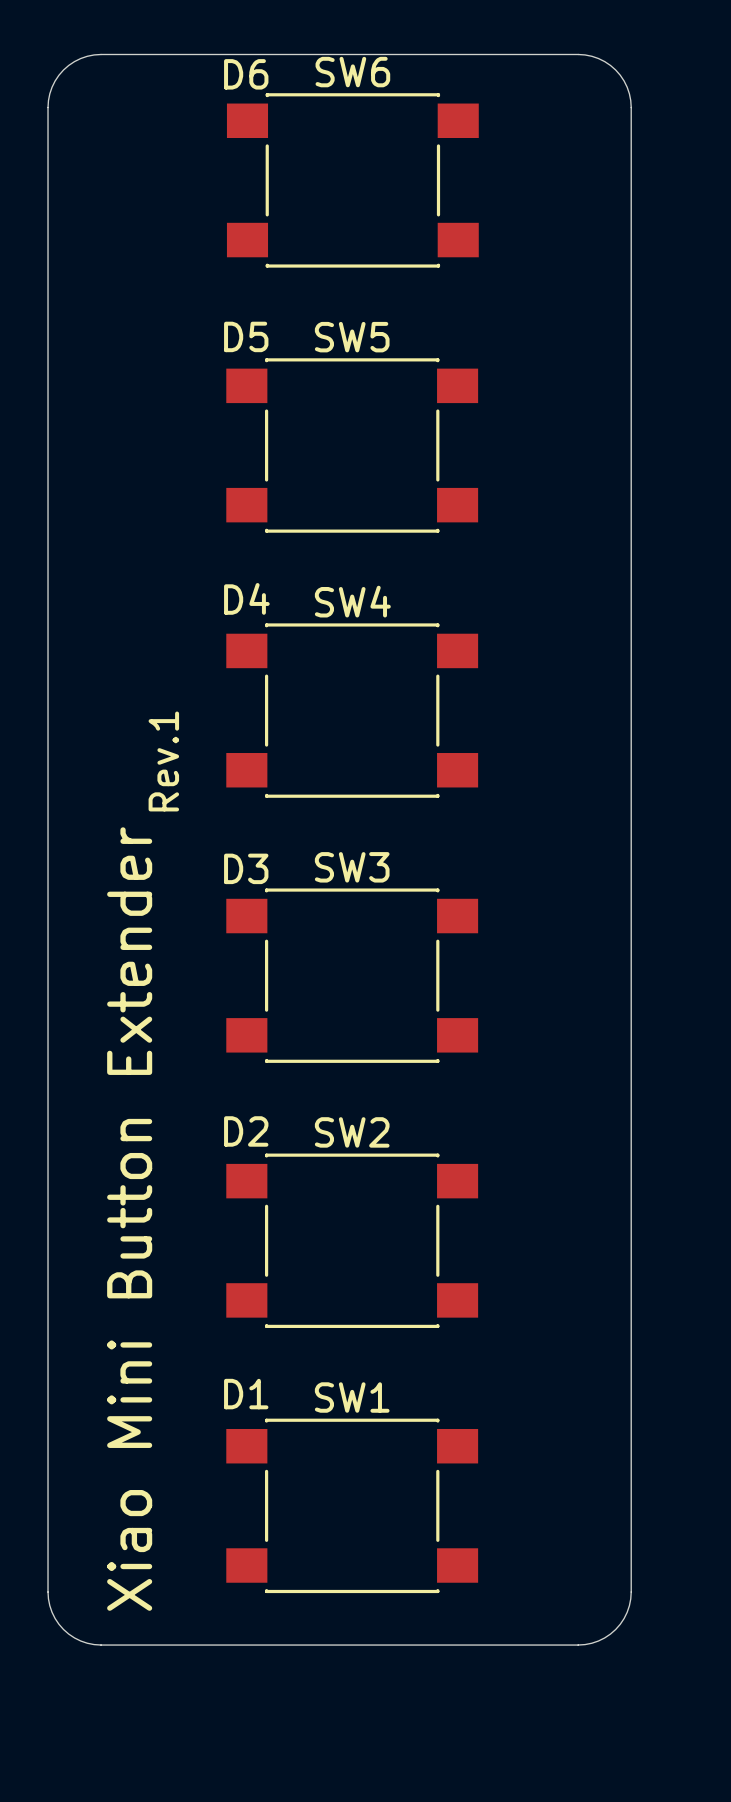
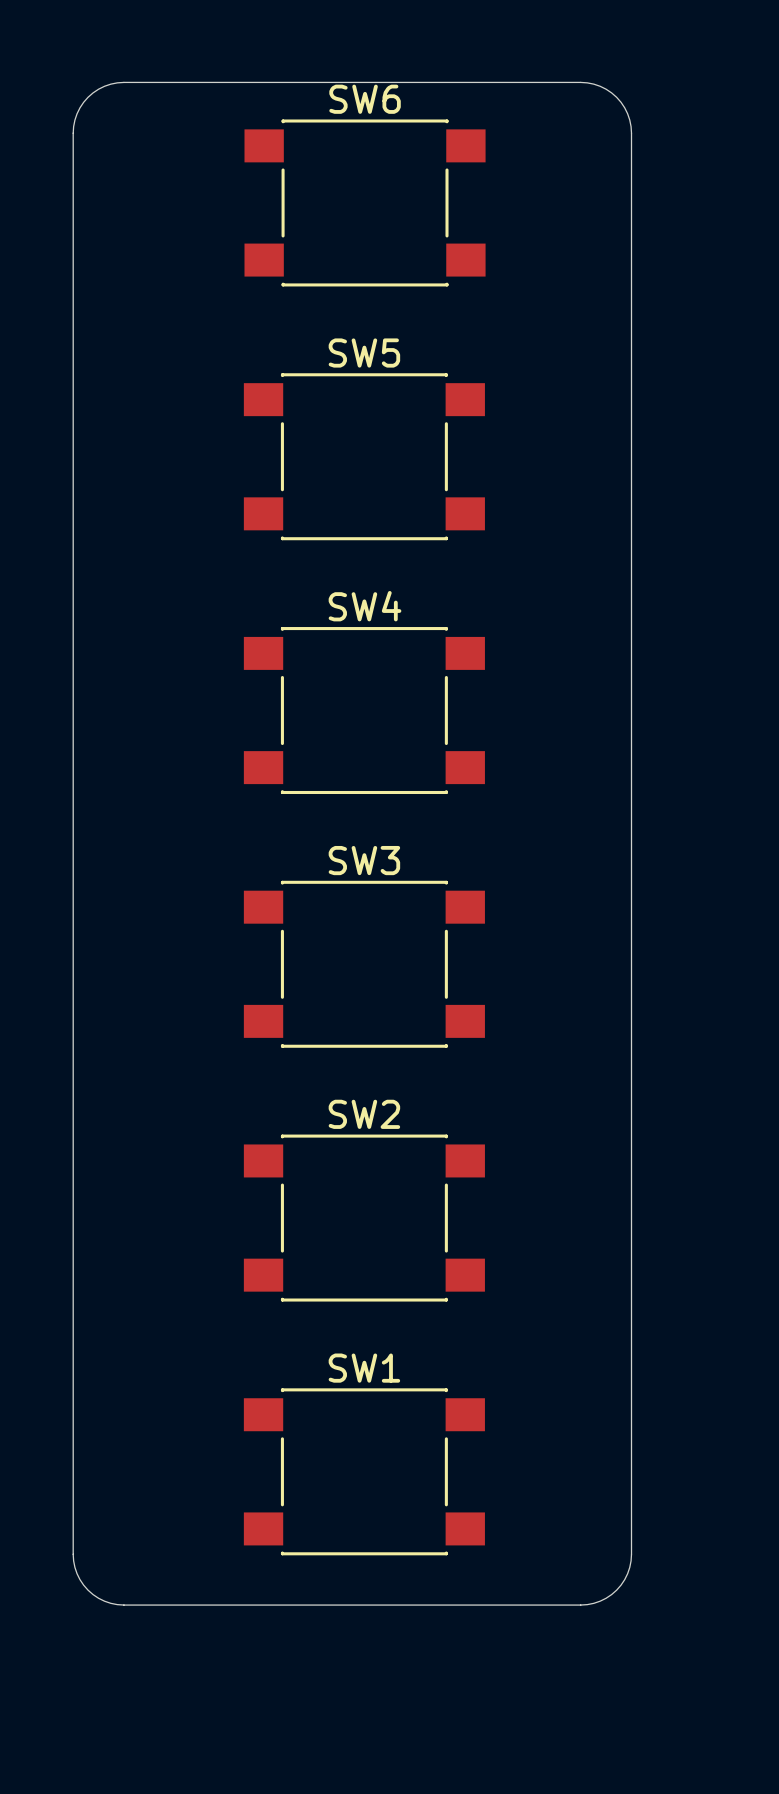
text: D6 (246, 74) -> none
text: D5 (246, 336) -> none
text: D4 (246, 598) -> none
text: Rev.1 (163, 761) -> none
text: D3 (246, 868) -> none
text: D2 (246, 1131) -> none
text: Xiao Mini Button Extender (129, 1219) -> none
text: D1 (246, 1394) -> none

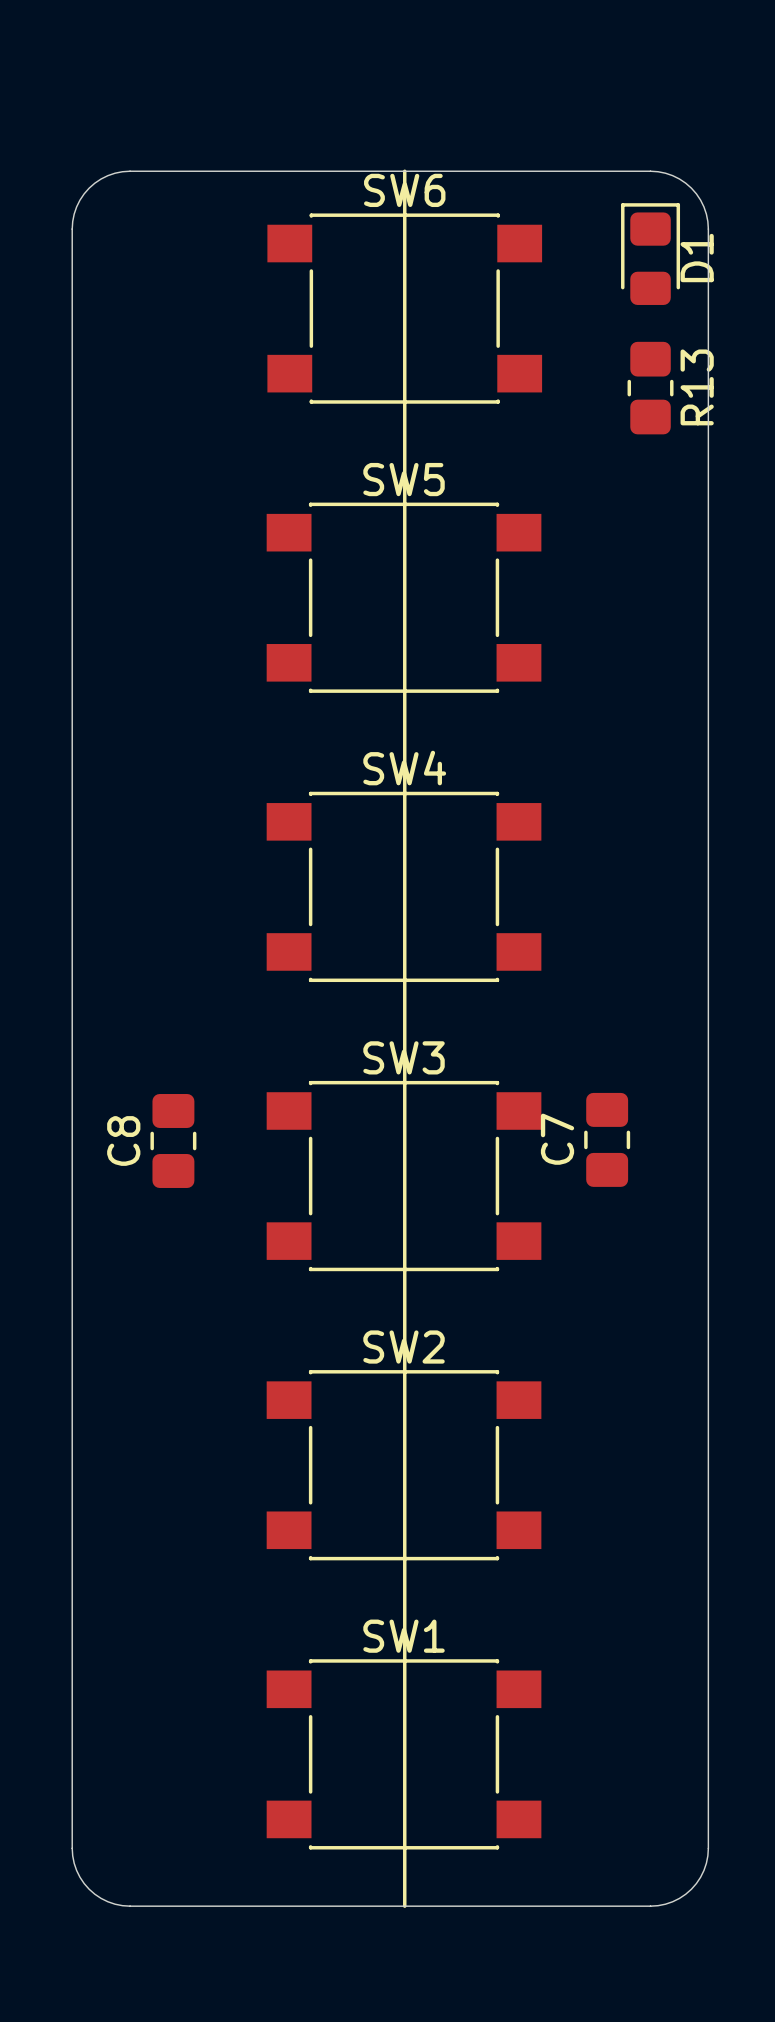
line: none -> (404, 171) (404, 1906)
D1: none -> (650, 254)
R13: none -> (650, 388)
C7: none -> (607, 1139)
C8: none -> (173, 1140)

